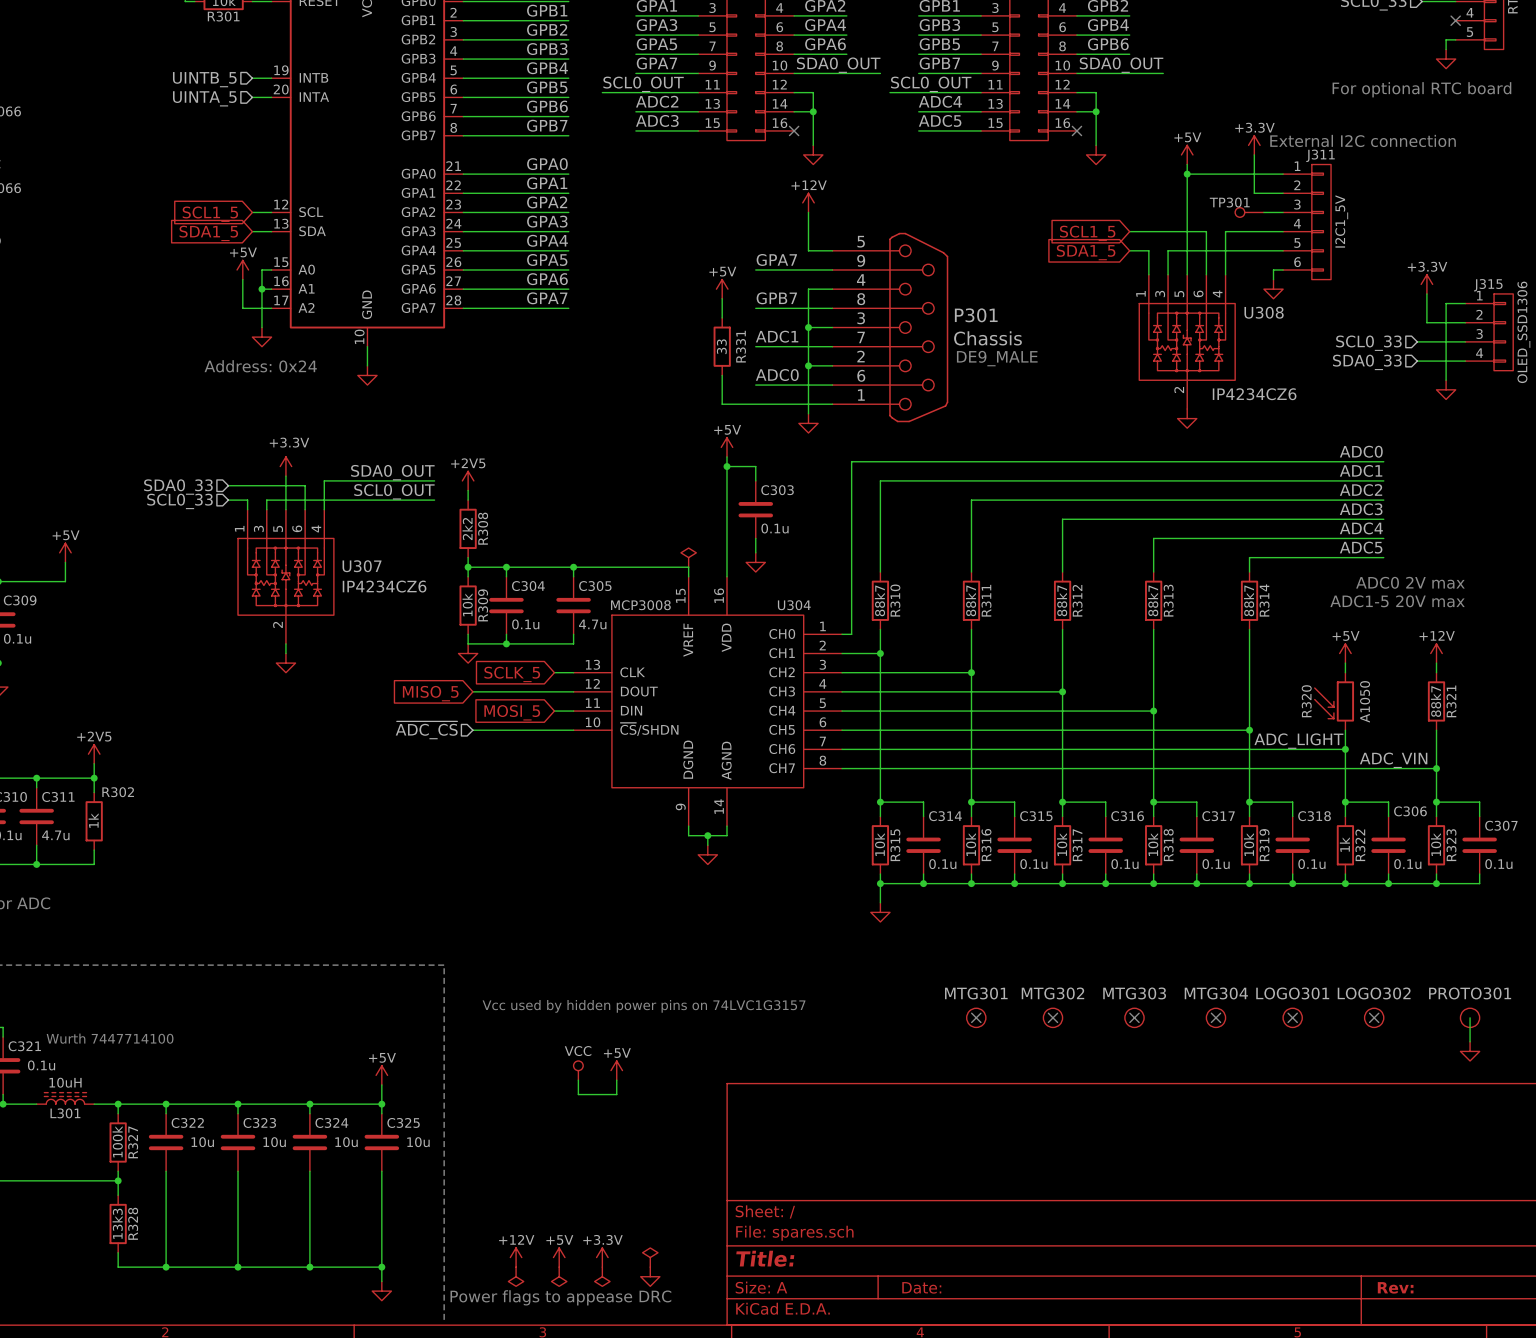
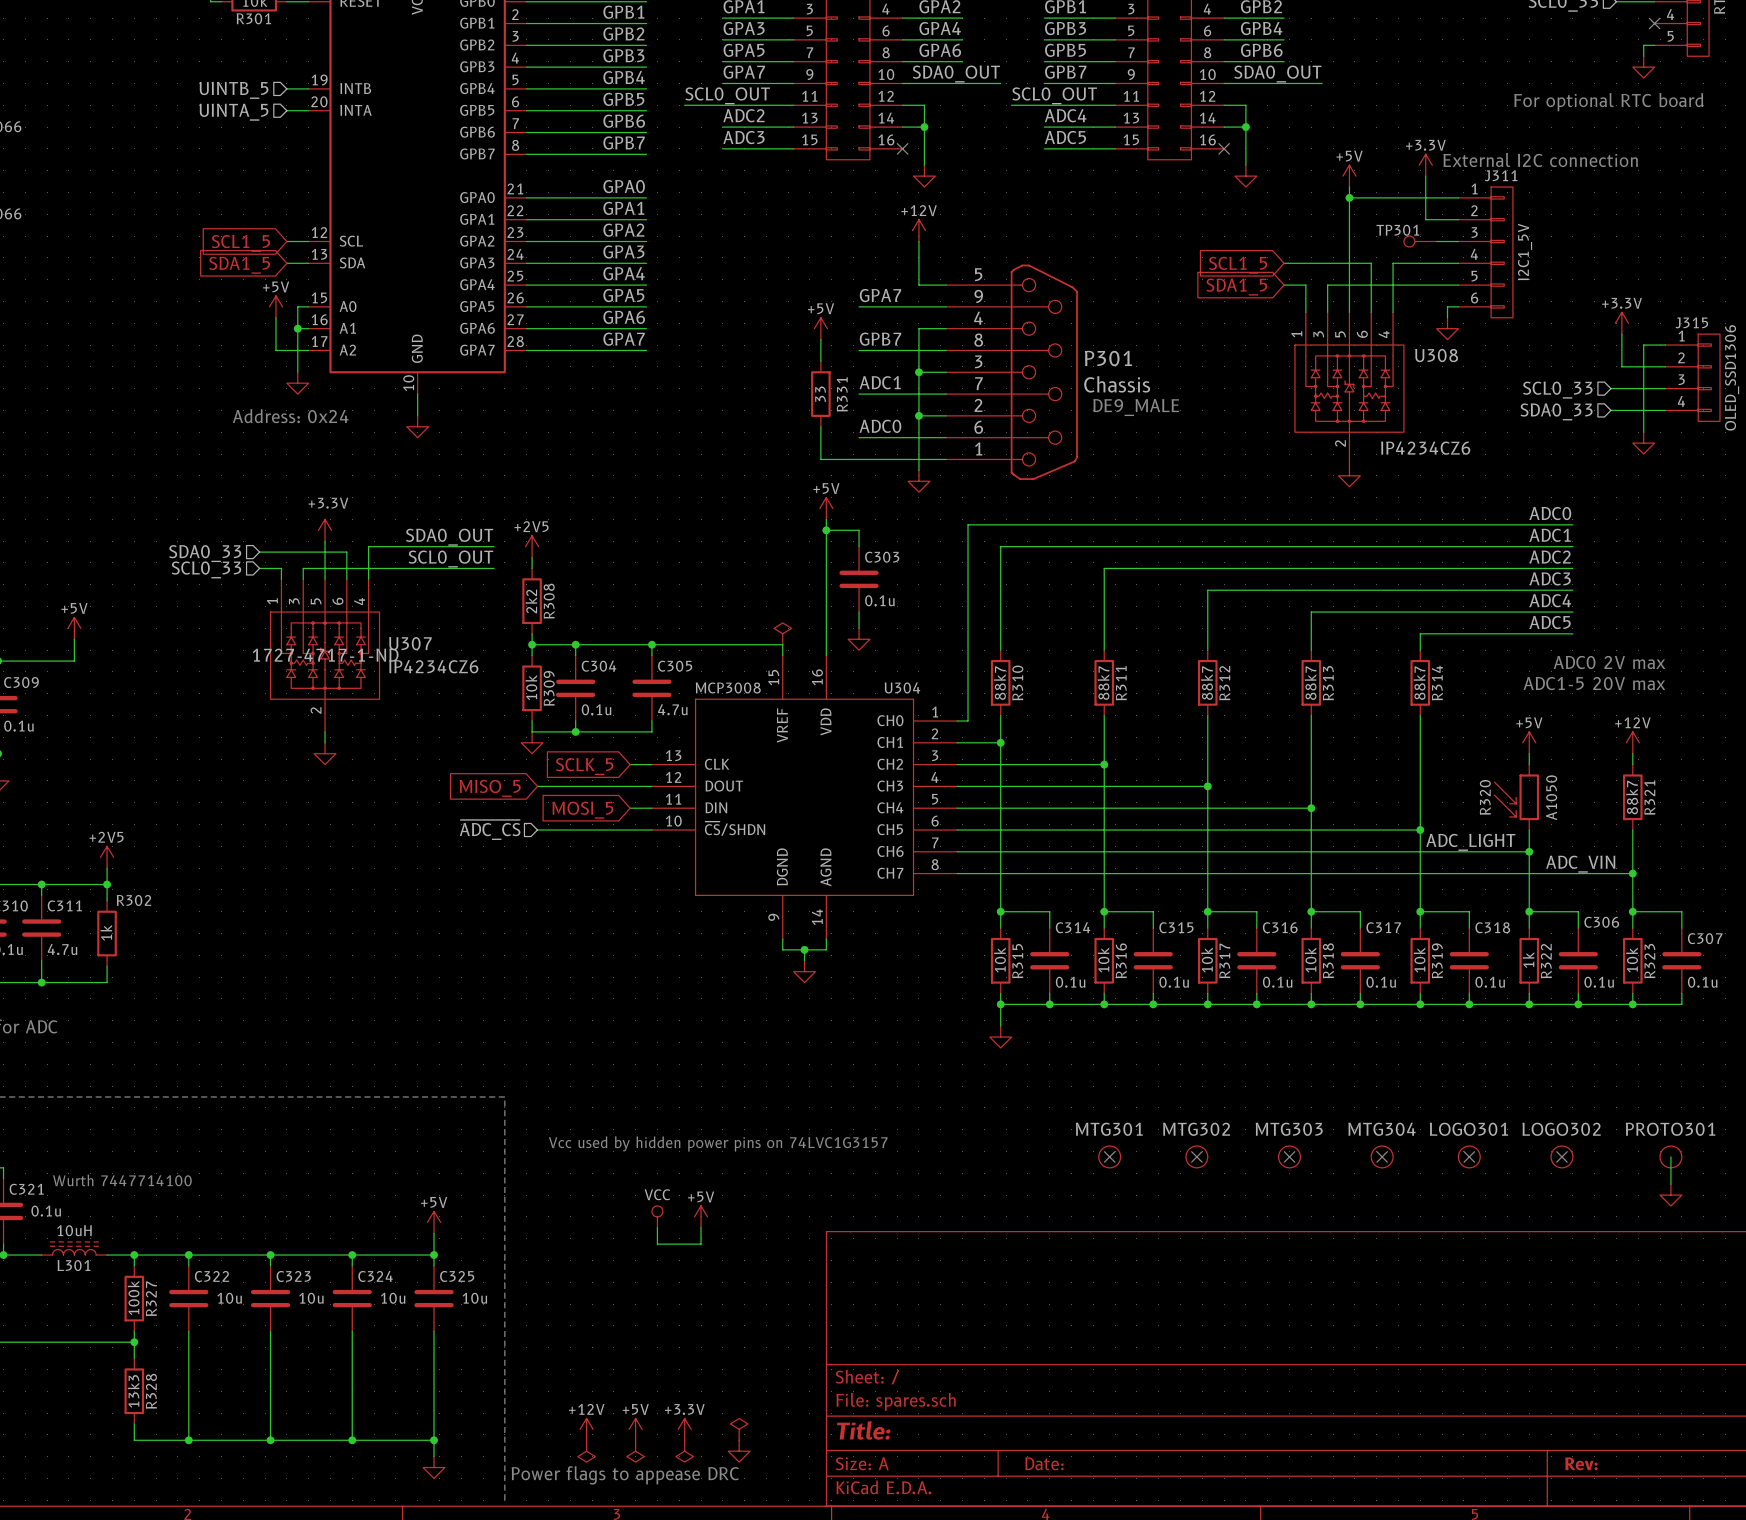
U307 text: none -> 1727-4717-1-ND (325, 655)

